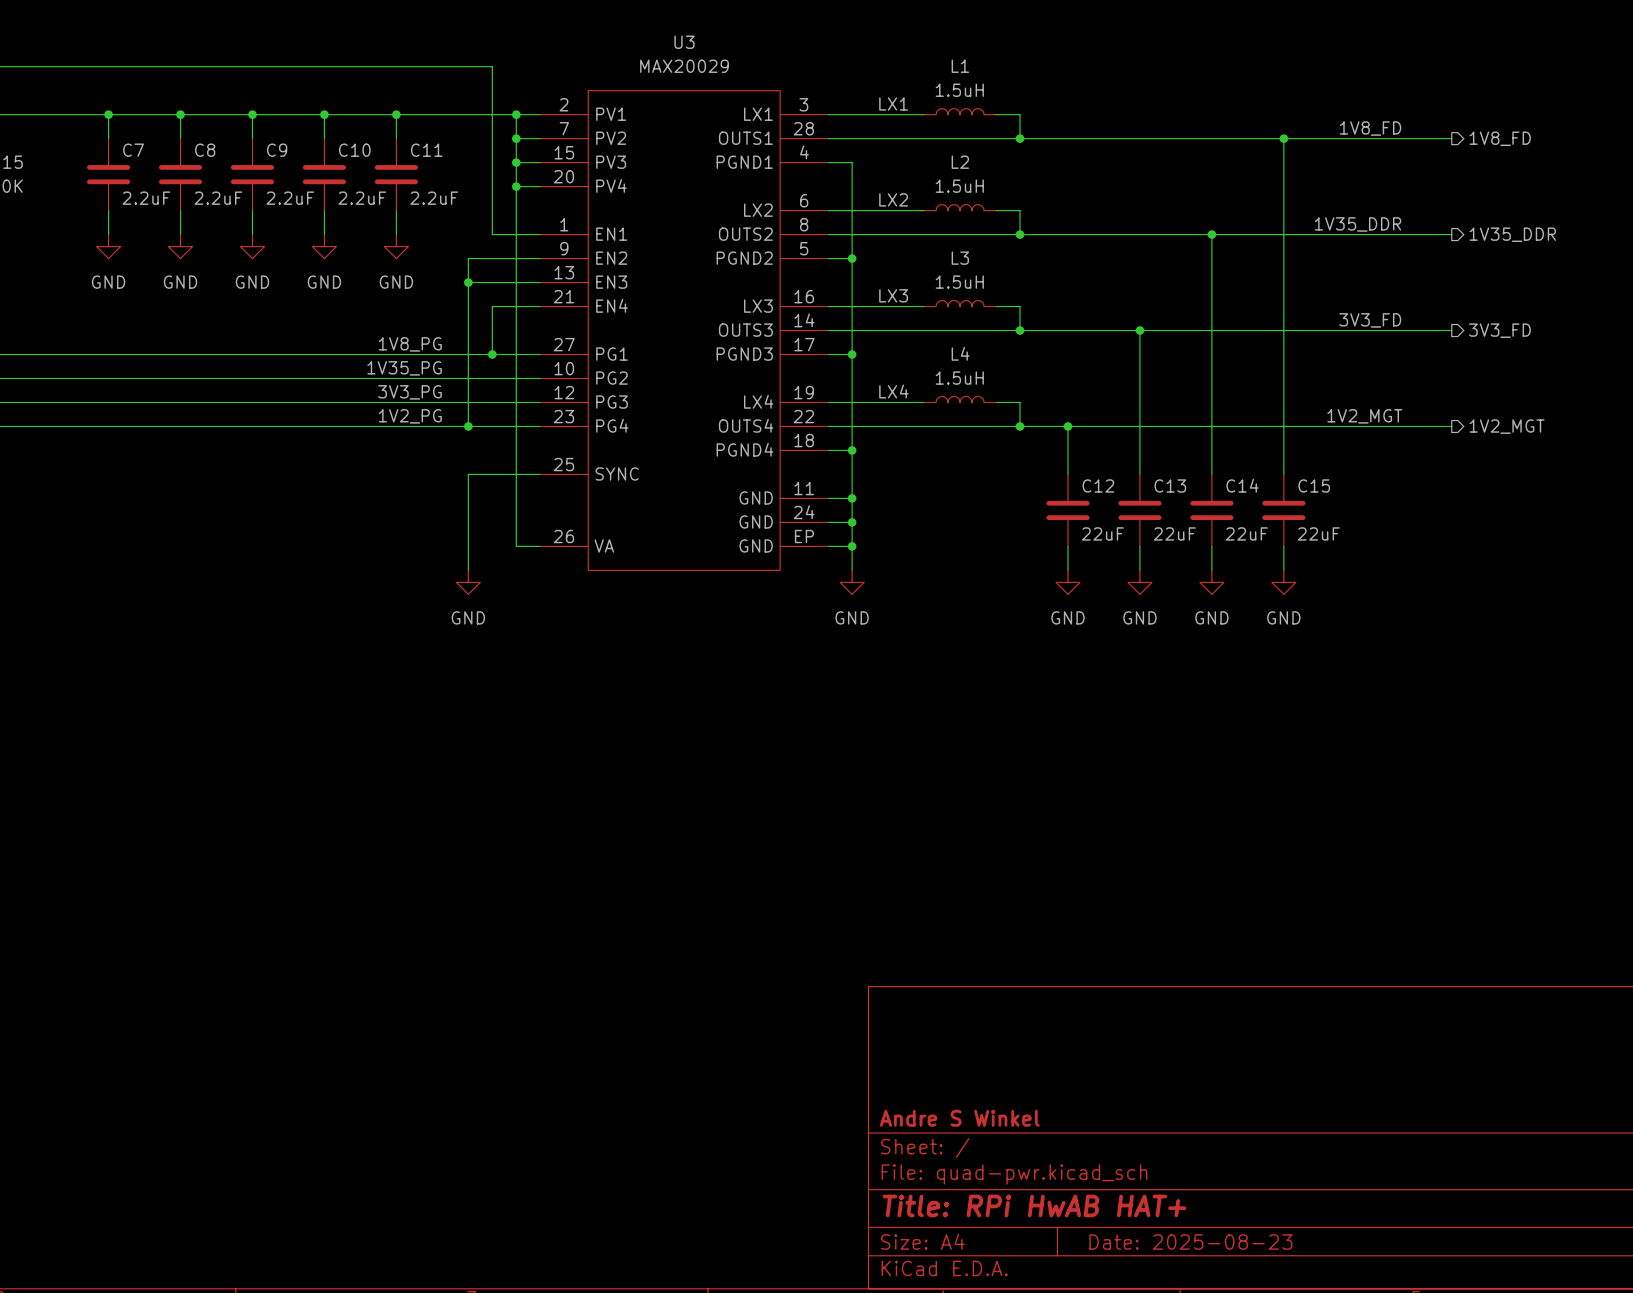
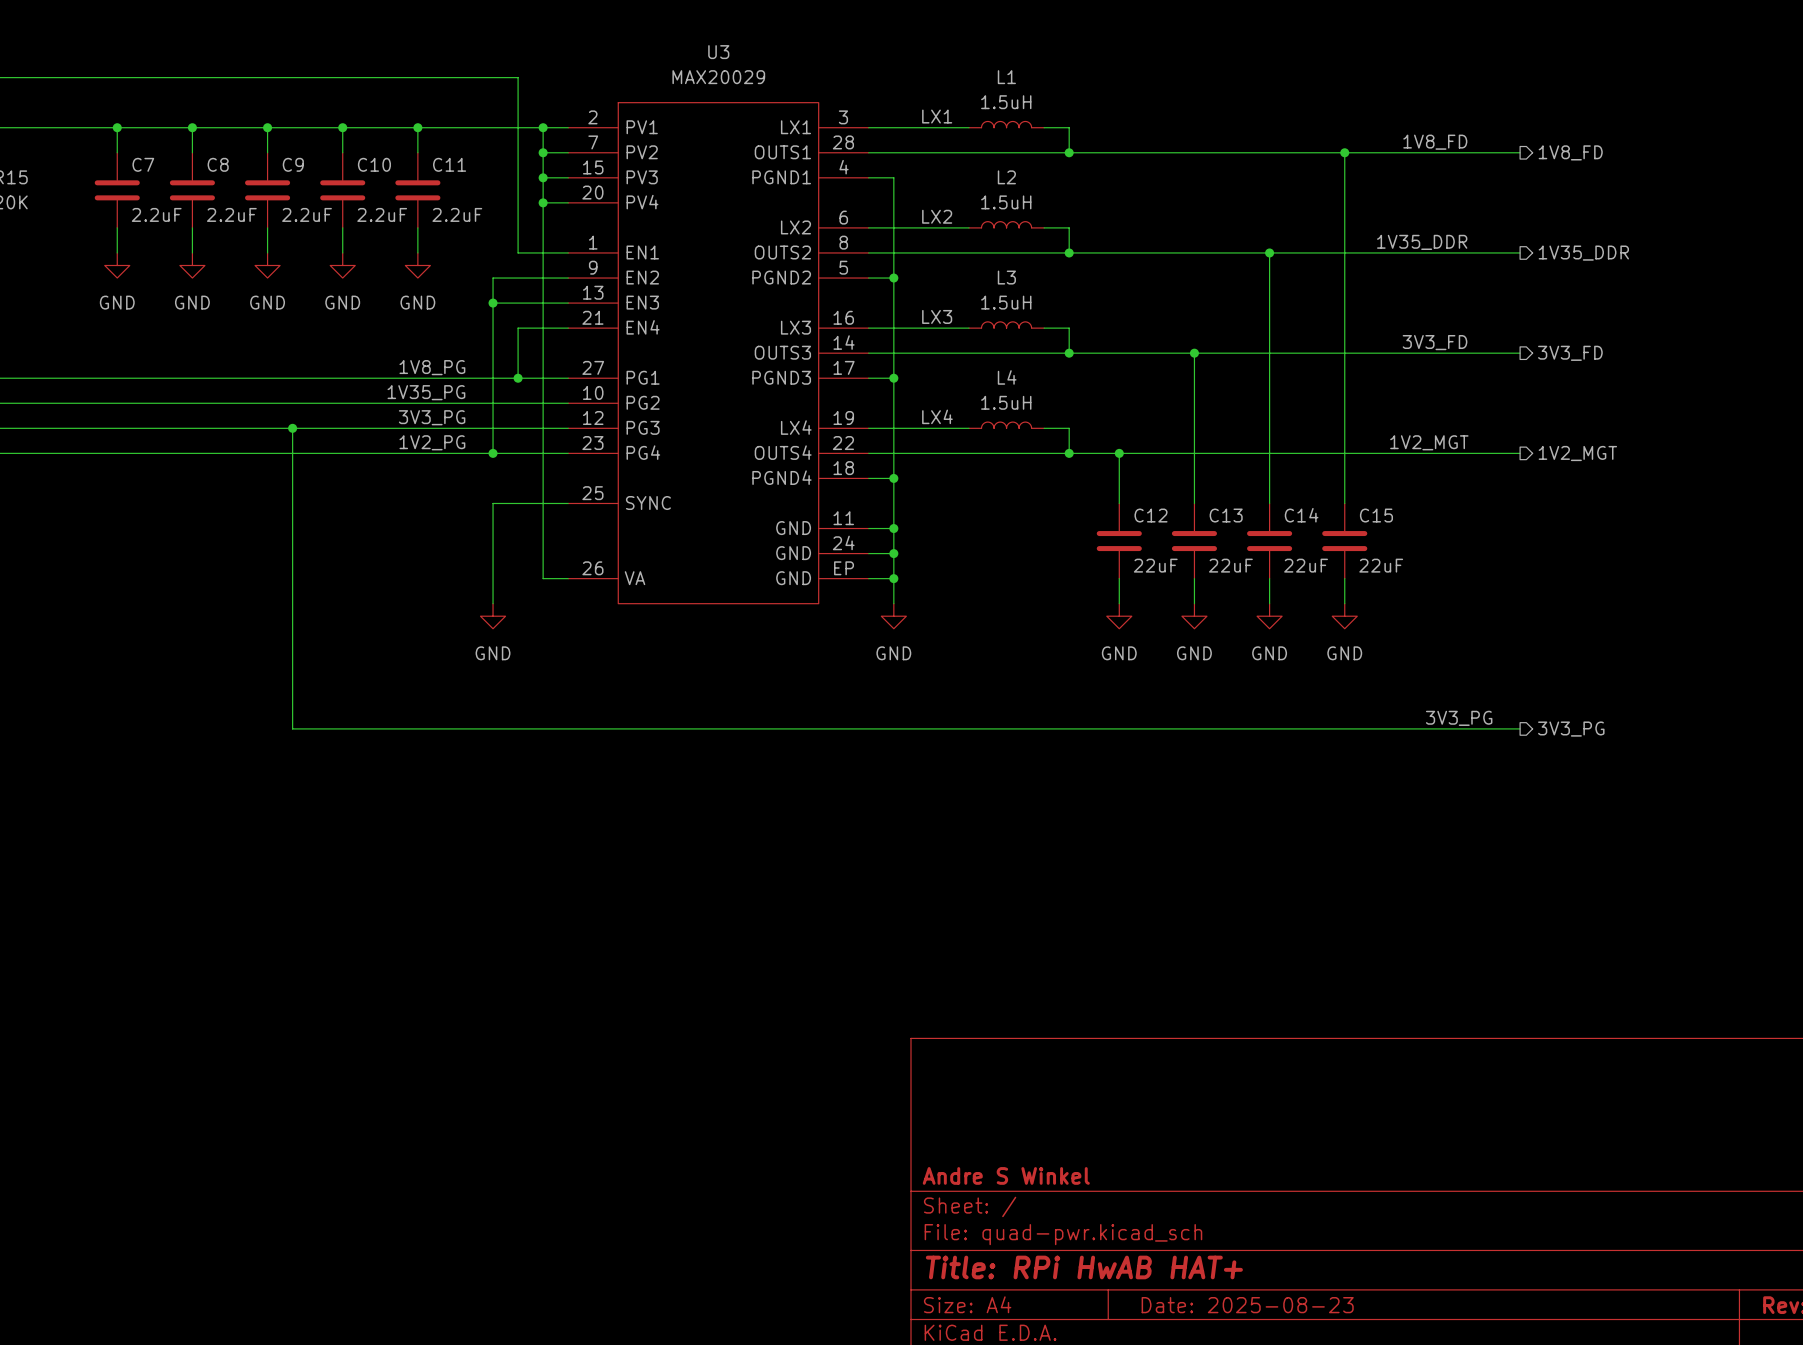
wire: none -> (292, 428) (292, 728) (1520, 728)
junction: none -> (292, 428)
label: none -> 3V3_PG (1459, 718)
hierarchical label: none -> 3V3_PG (1571, 729)

